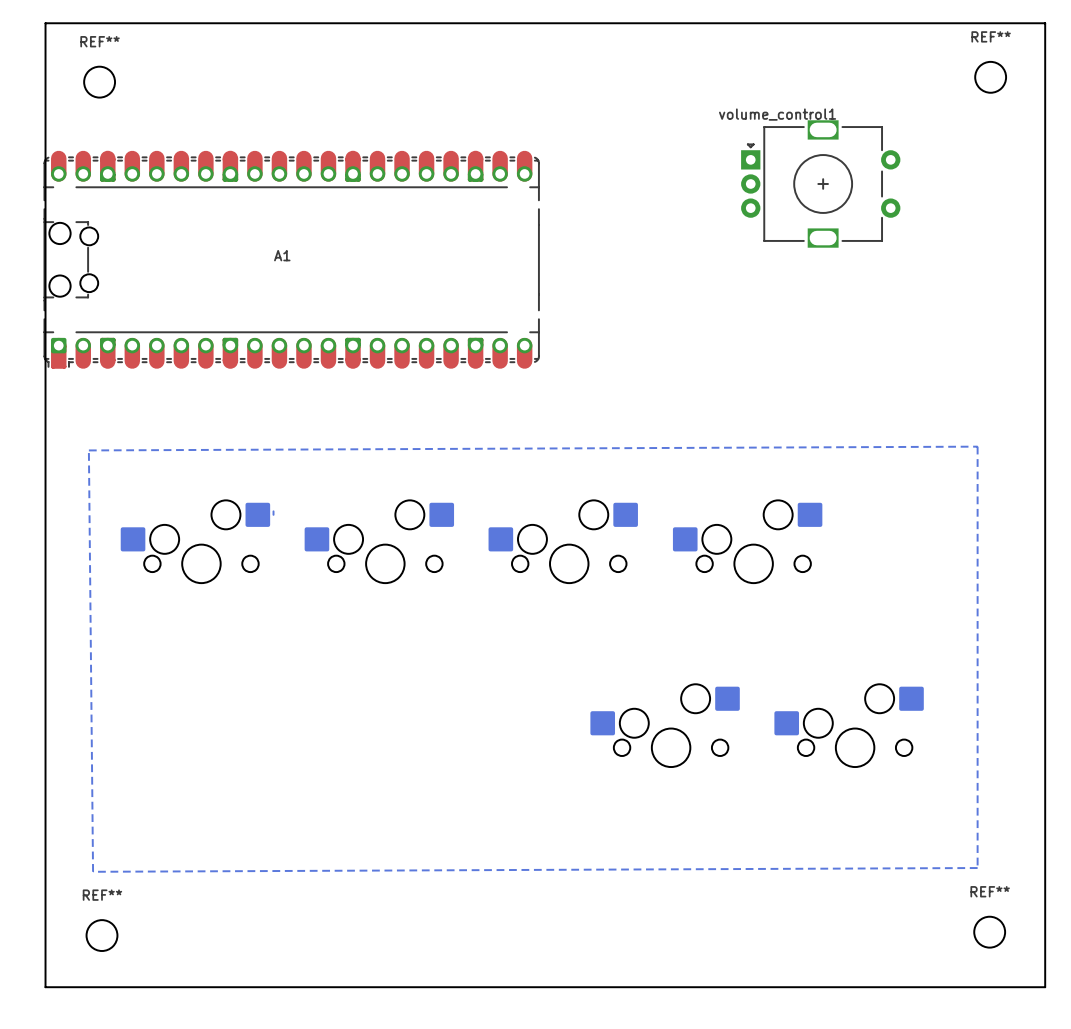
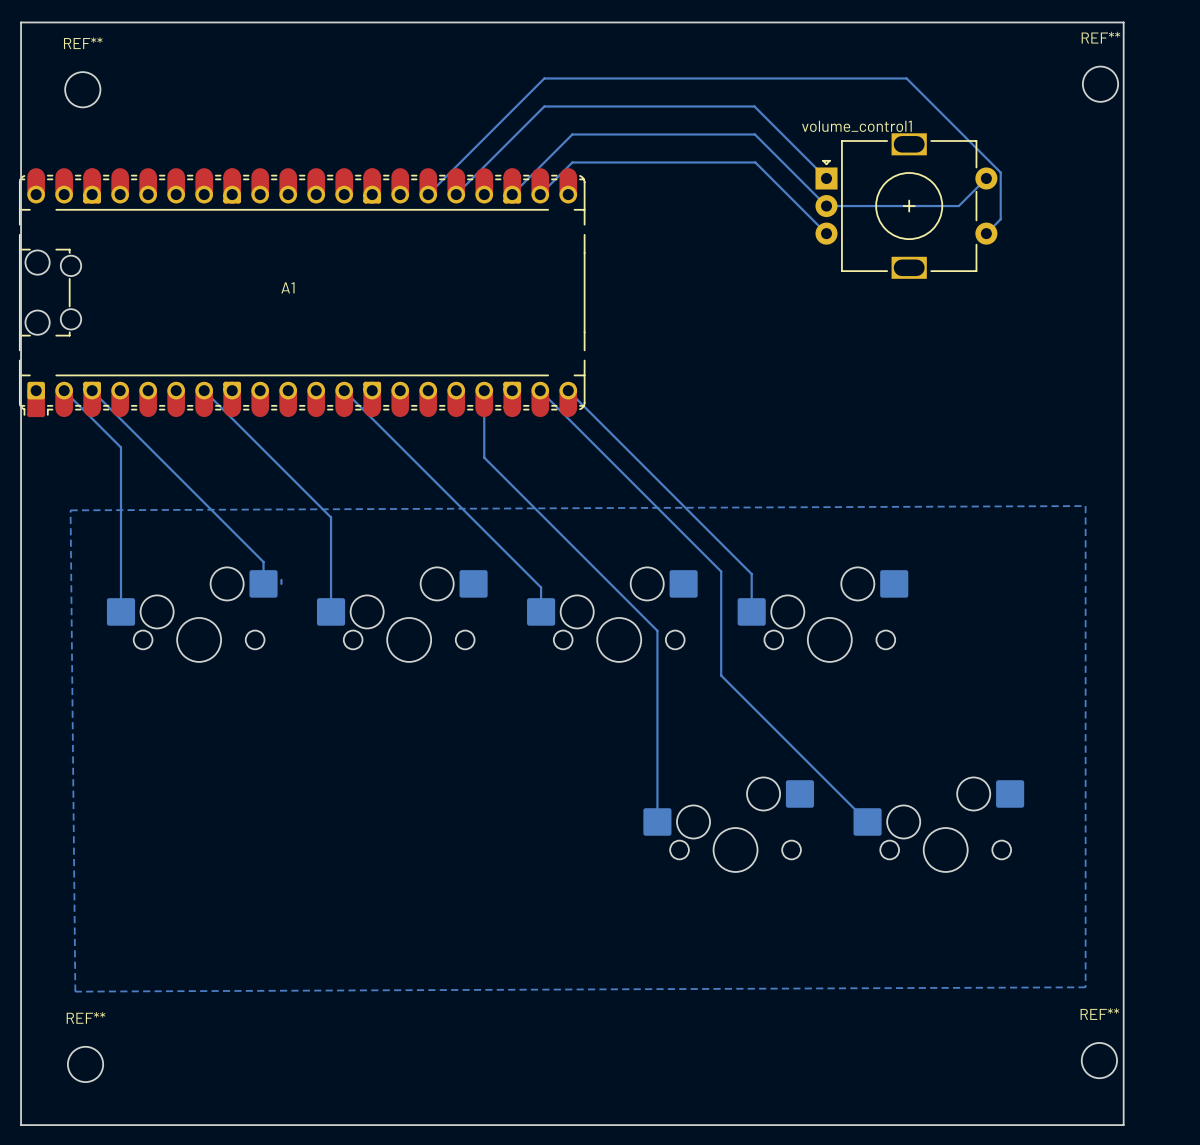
board edge: (1010, 23) (1045, 23) (1045, 987) (45, 987) -> (1123, 22) (1123, 1125) (21, 1125) (21, 1123)
bottom track: none -> (826, 178) (754, 106) (544, 106) (456, 194)
bottom track: none -> (986, 178) (958, 206) (826, 206)
bottom track: none -> (428, 194) (544, 78) (906, 78) (1000, 172) (1000, 219) (986, 233)
bottom track: none -> (512, 194) (572, 134) (754, 134) (826, 206)
bottom track: none -> (540, 194) (572, 162) (755, 162) (826, 233)
bottom track: none -> (64, 390) (120, 447) (120, 611)
bottom track: none -> (92, 390) (263, 562) (263, 583)
bottom track: none -> (204, 390) (331, 517) (331, 611)
bottom track: none -> (344, 390) (541, 587) (541, 611)
bottom track: none -> (484, 390) (484, 457) (657, 630) (657, 821)
bottom track: none -> (540, 390) (721, 571) (721, 675) (867, 821)
bottom track: none -> (568, 390) (751, 574) (751, 611)

